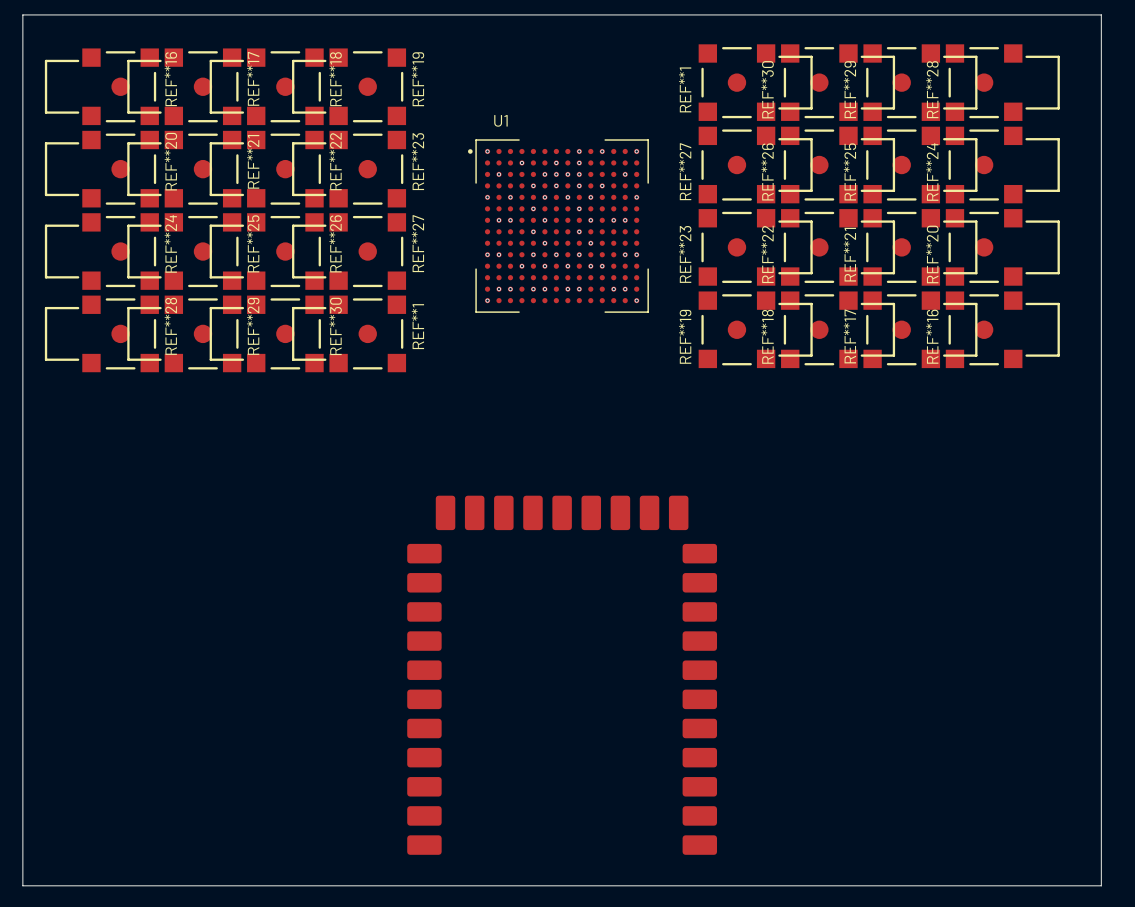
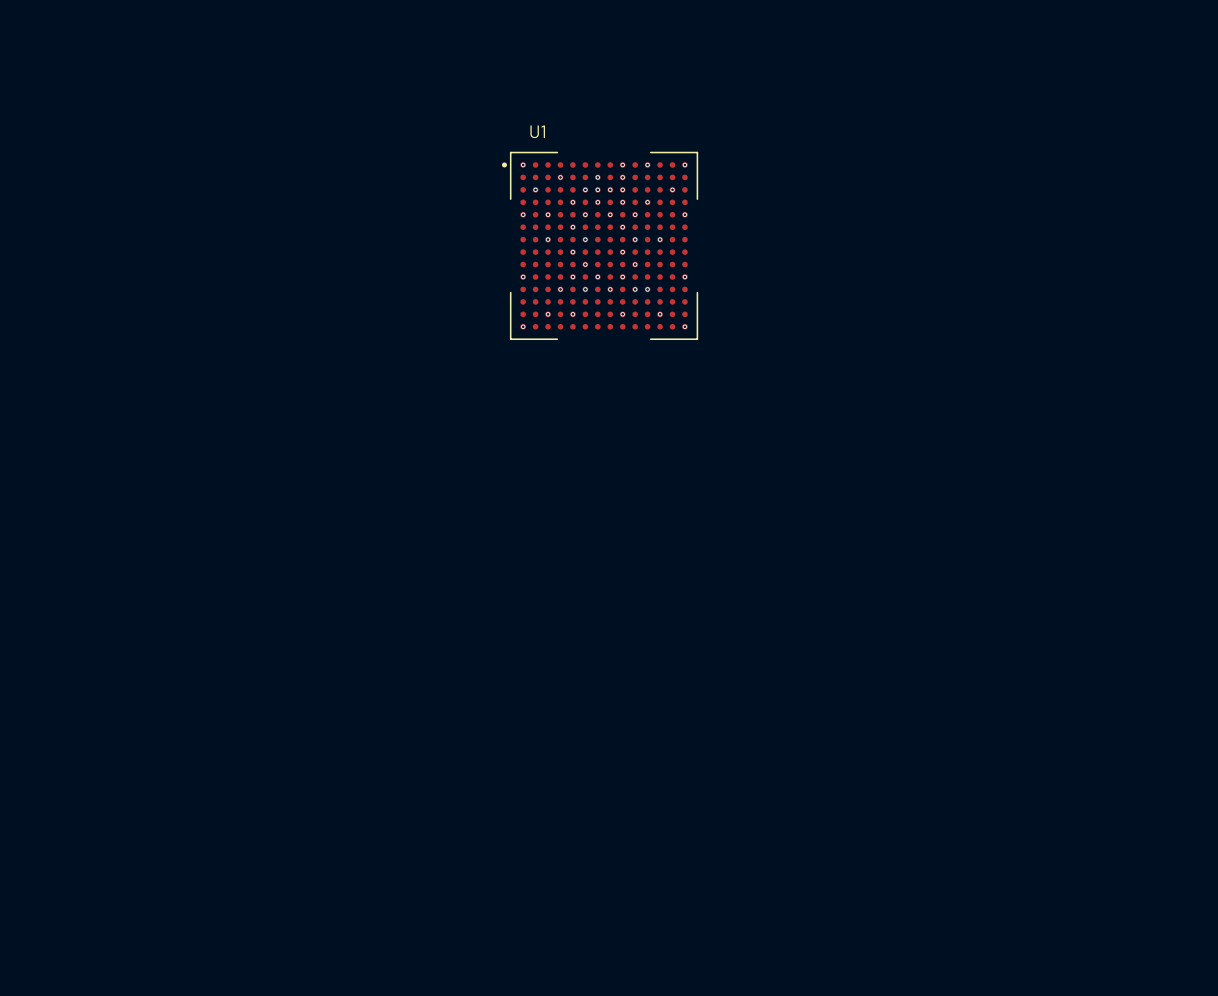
board edge: (22, 14) (1101, 14) (1101, 885) (22, 885) (22, 14) -> none
REF**1: (755, 82) -> none
REF**30: (838, 82) -> none
REF**29: (920, 82) -> none
REF**28: (1002, 82) -> none
REF**16: (101, 86) -> none
REF**17: (184, 86) -> none
REF**18: (266, 86) -> none
REF**19: (349, 86) -> none
REF**27: (755, 165) -> none
REF**26: (838, 165) -> none
REF**25: (920, 165) -> none
REF**24: (1002, 165) -> none
REF**20: (101, 169) -> none
REF**21: (184, 169) -> none
REF**22: (266, 169) -> none
REF**23: (349, 169) -> none
via: (499, 220) -> none
via: (625, 220) -> none
REF**23: (755, 247) -> none
REF**22: (838, 247) -> none
REF**21: (920, 247) -> none
REF**20: (1002, 247) -> none
REF**24: (101, 251) -> none
REF**25: (184, 251) -> none
REF**26: (266, 251) -> none
REF**27: (349, 251) -> none
via: (499, 254) -> none
via: (625, 254) -> none
via: (499, 289) -> none
via: (544, 289) -> none
via: (567, 289) -> none
via: (625, 289) -> none
REF**19: (755, 329) -> none
REF**18: (838, 329) -> none
REF**17: (920, 329) -> none
REF**16: (1002, 329) -> none
REF**28: (101, 333) -> none
REF**29: (184, 333) -> none
REF**30: (266, 333) -> none
REF**1: (349, 333) -> none
part: (562, 512) -> none
part: (424, 699) -> none
part: (699, 699) -> none

